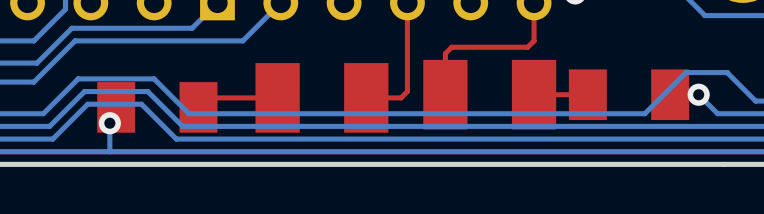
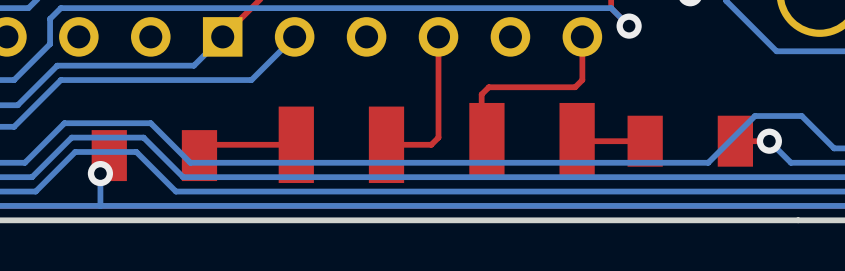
part footprint: [423, 59, 557, 130] -> [469, 102, 595, 180]
part footprint: [255, 63, 389, 133] -> [278, 106, 405, 184]
part footprint: [568, 69, 690, 121] -> [627, 115, 753, 167]
part footprint: [97, 82, 218, 133] -> [91, 130, 218, 182]

